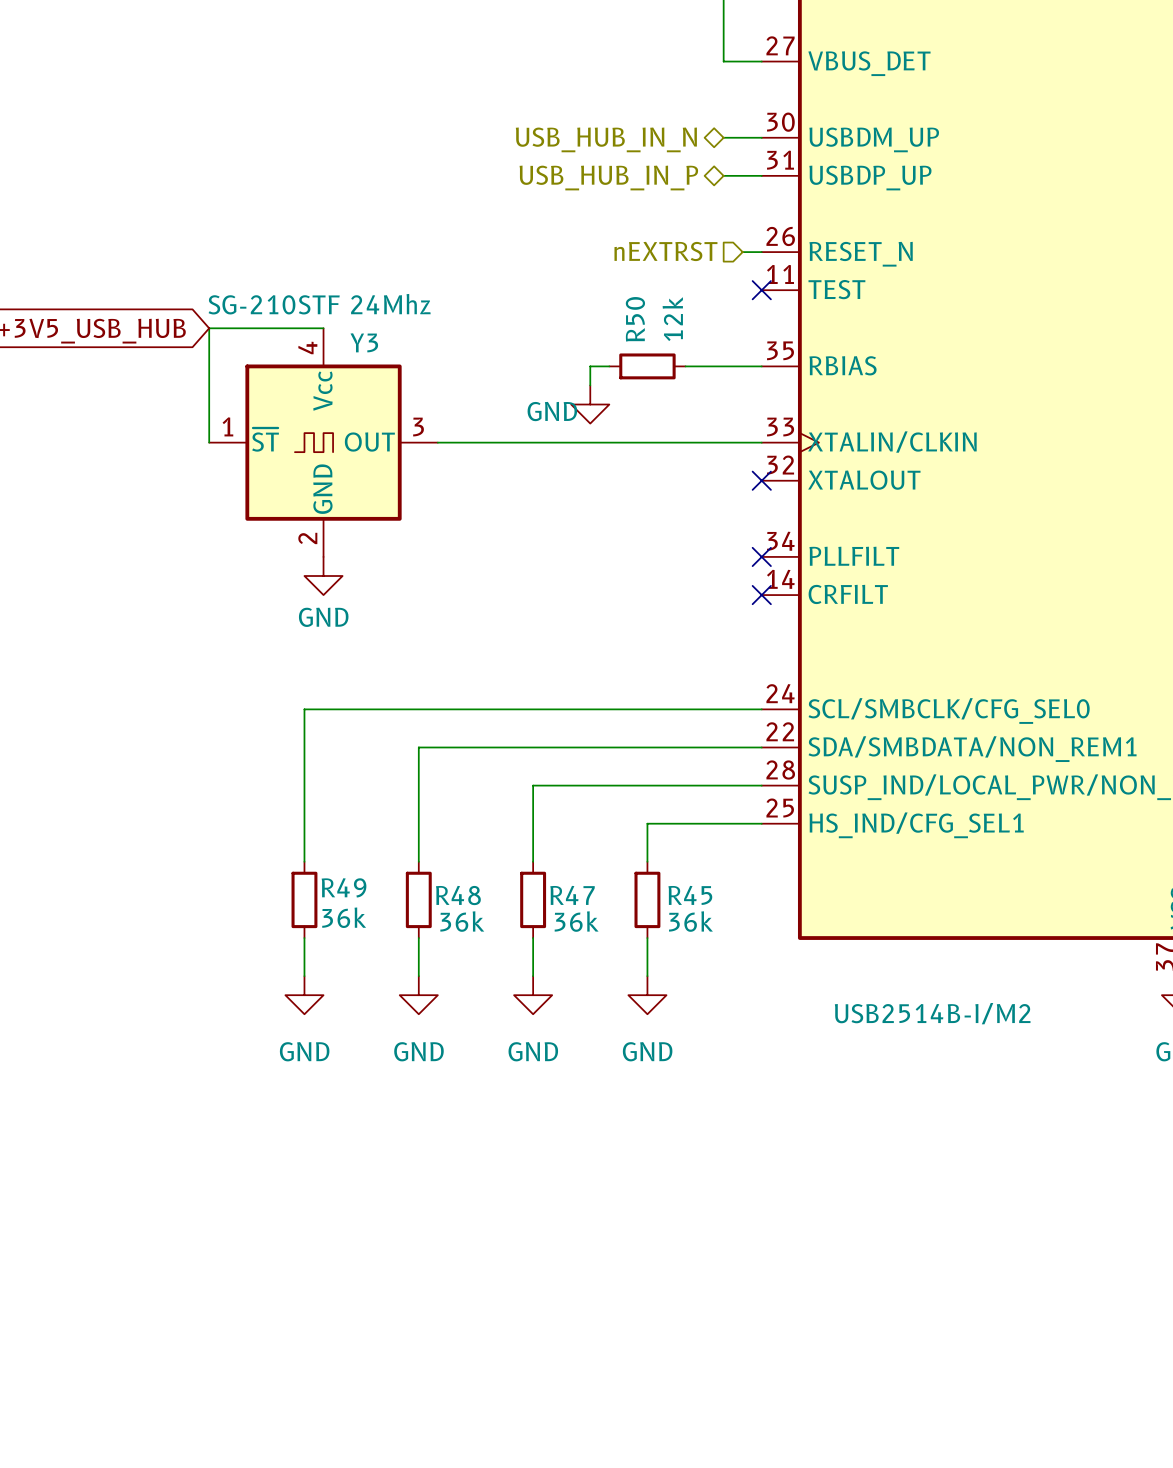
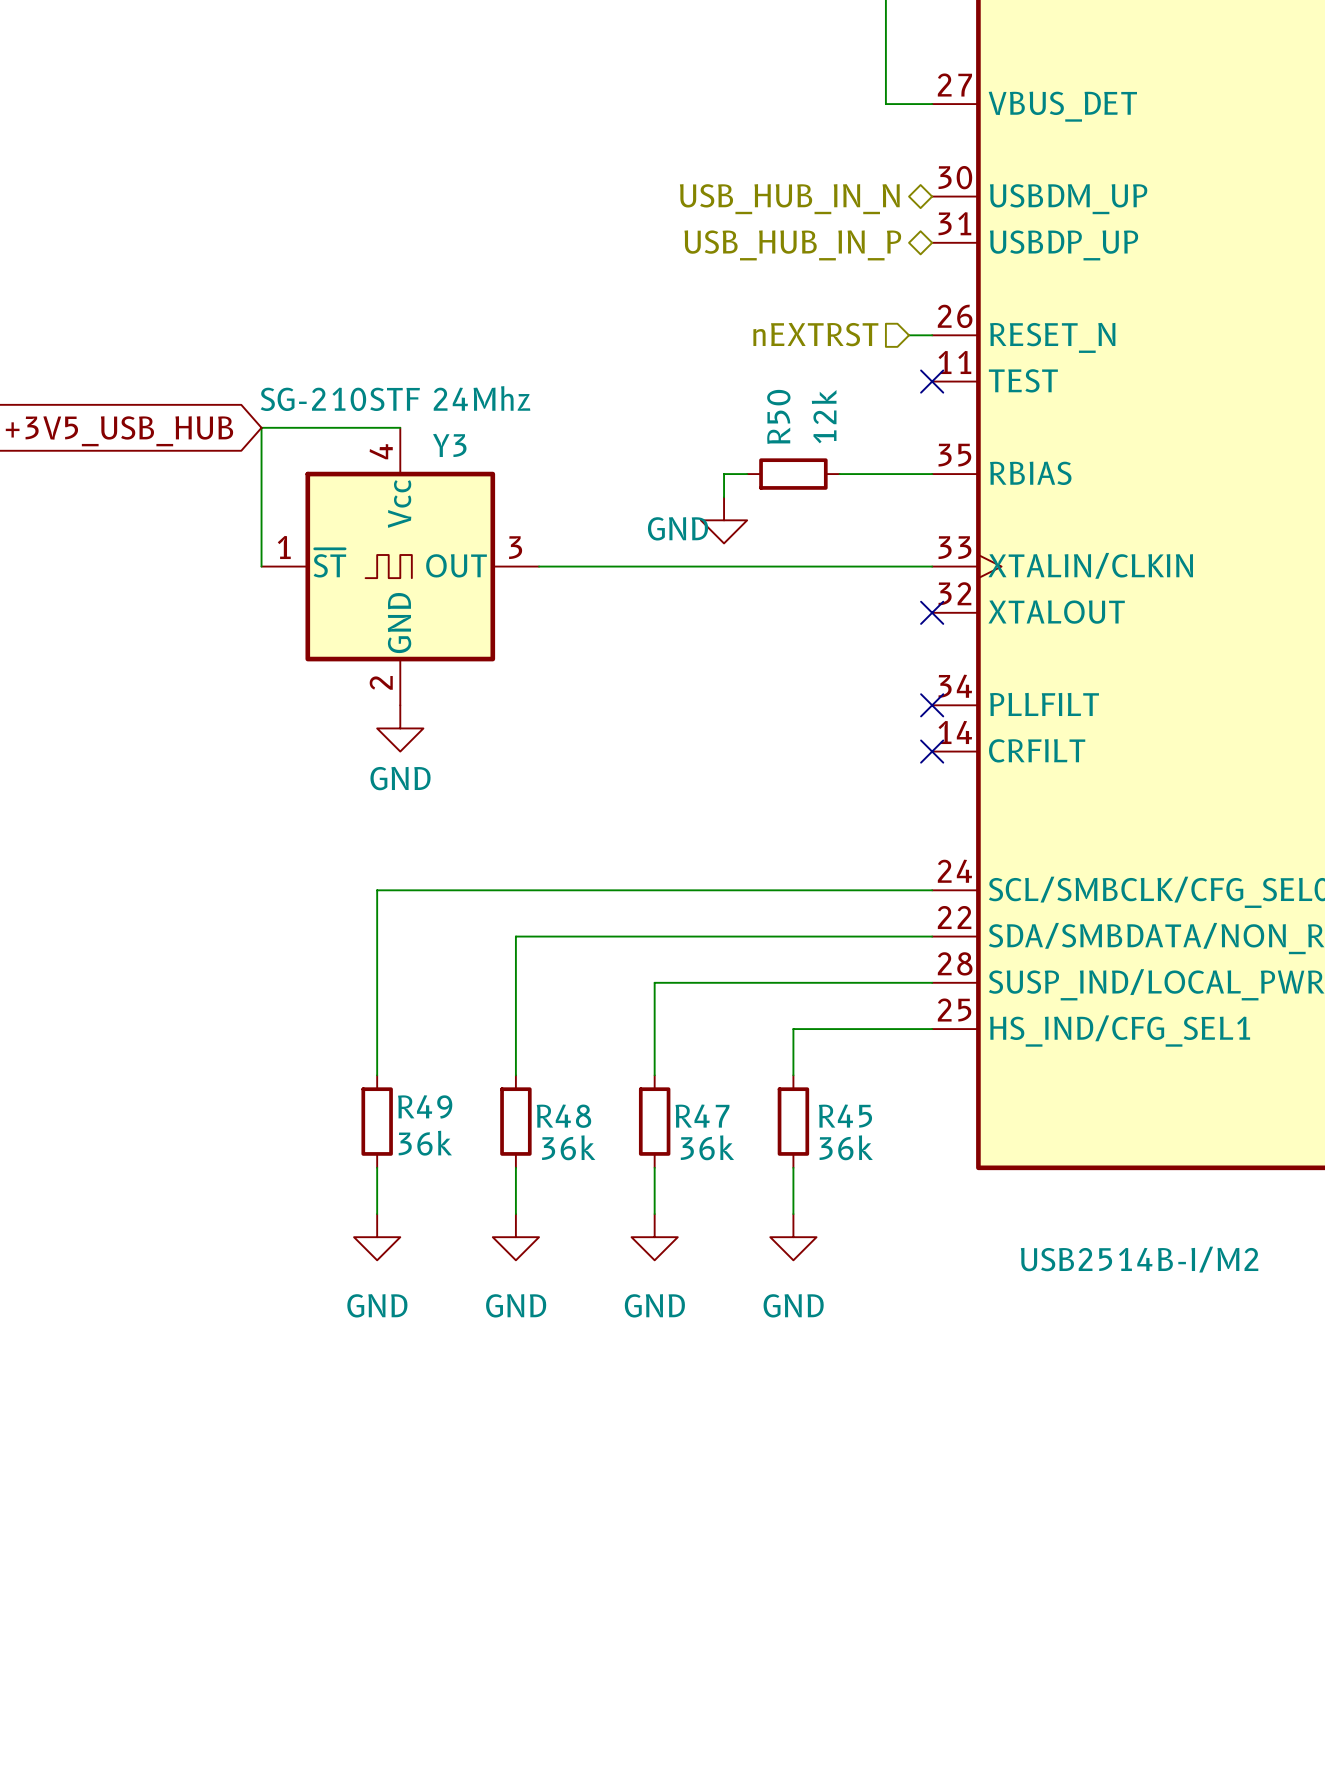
wire: (723, 137) (761, 137) -> none
hierarchical label position: USB_HUB_IN_N (606, 139) -> USB_HUB_IN_N (789, 199)
wire: (723, 175) (761, 175) -> none
hierarchical label position: USB_HUB_IN_P (608, 178) -> USB_HUB_IN_P (792, 245)

